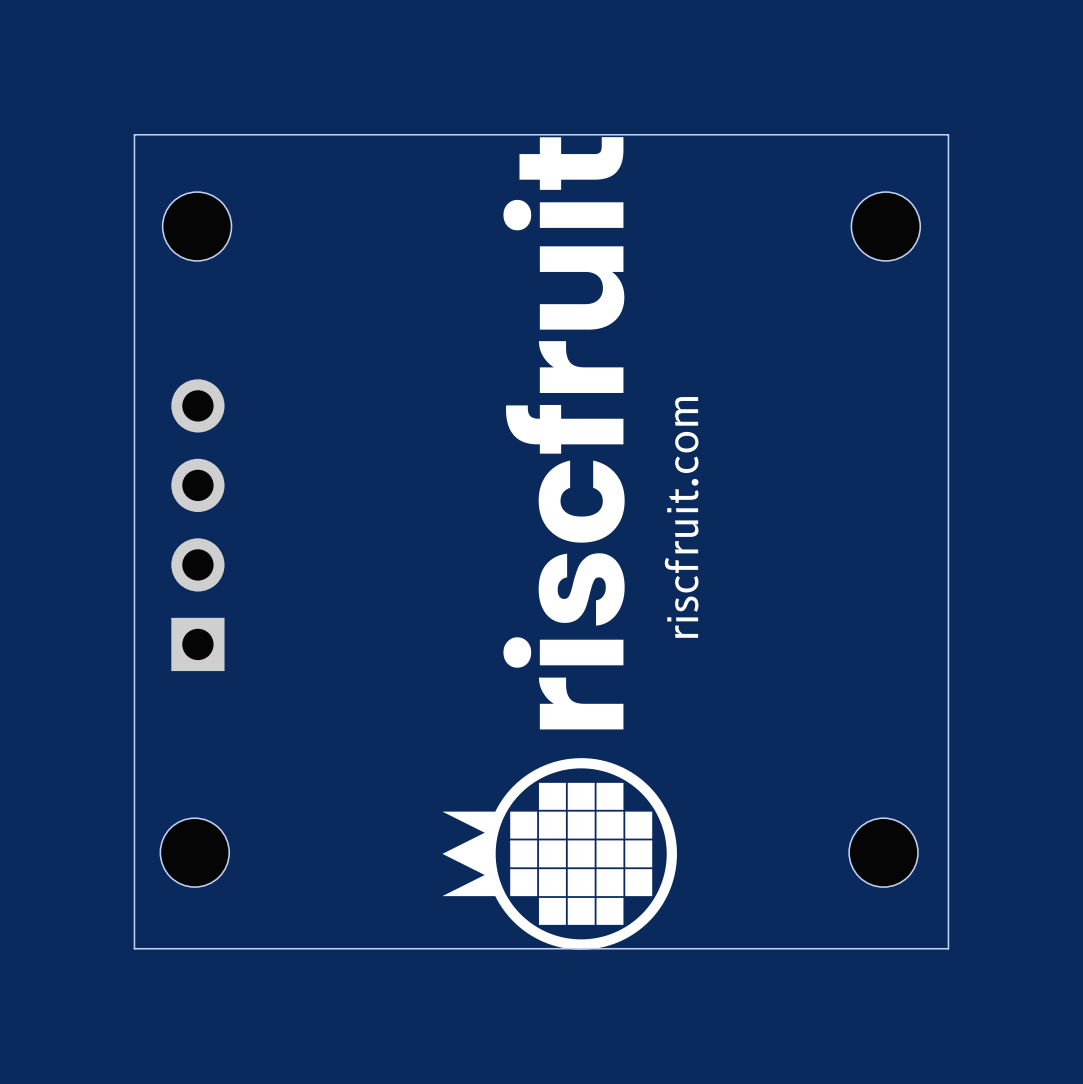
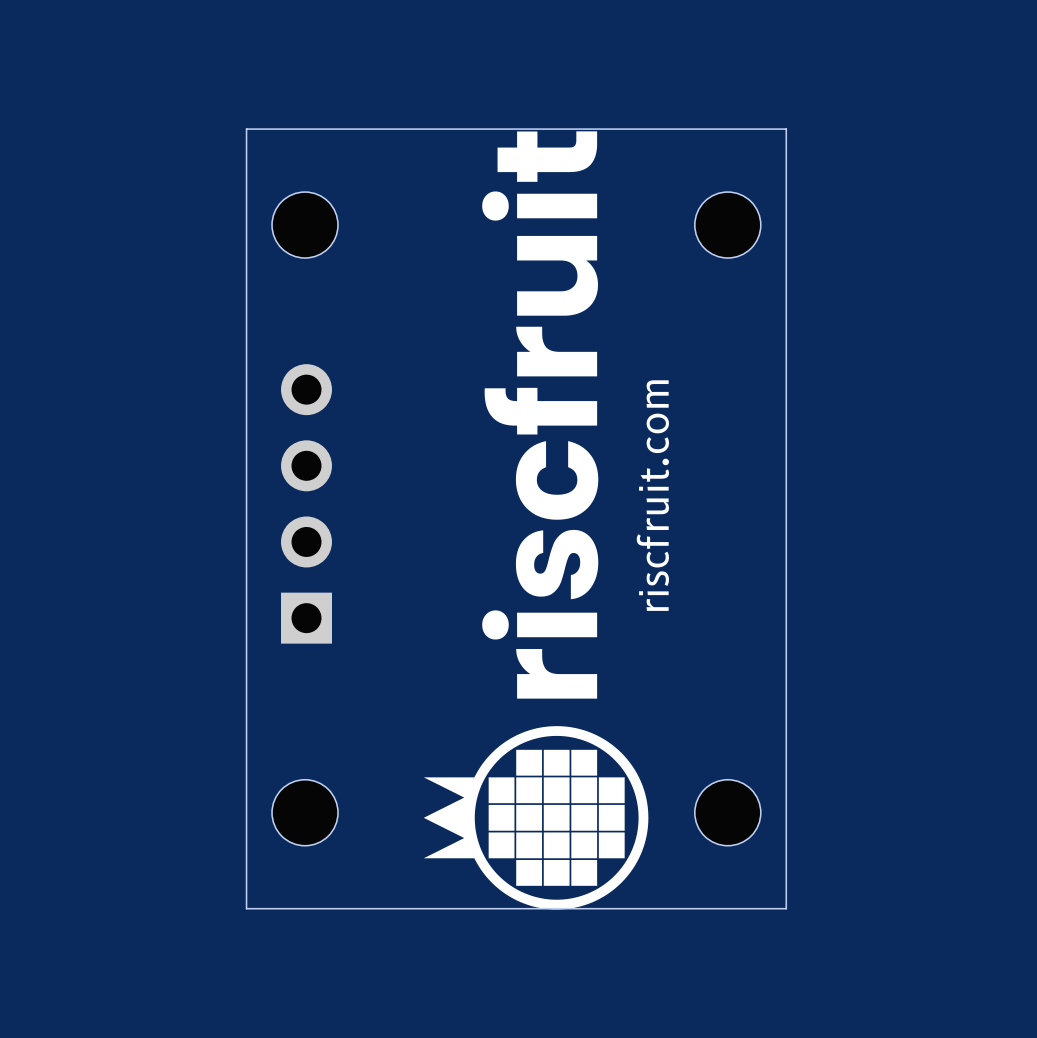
board edge: (257, 134) (134, 134) (134, 948) (257, 948) -> (246, 129) (246, 908)
board edge: (820, 134) (948, 134) (948, 948) (820, 948) -> (786, 129) (786, 908)
part position: (197, 226) -> (305, 225)
part position: (885, 226) -> (727, 225)
part position: (197, 525) -> (306, 503)
part position: (194, 852) -> (305, 812)
part position: (883, 852) -> (727, 812)

